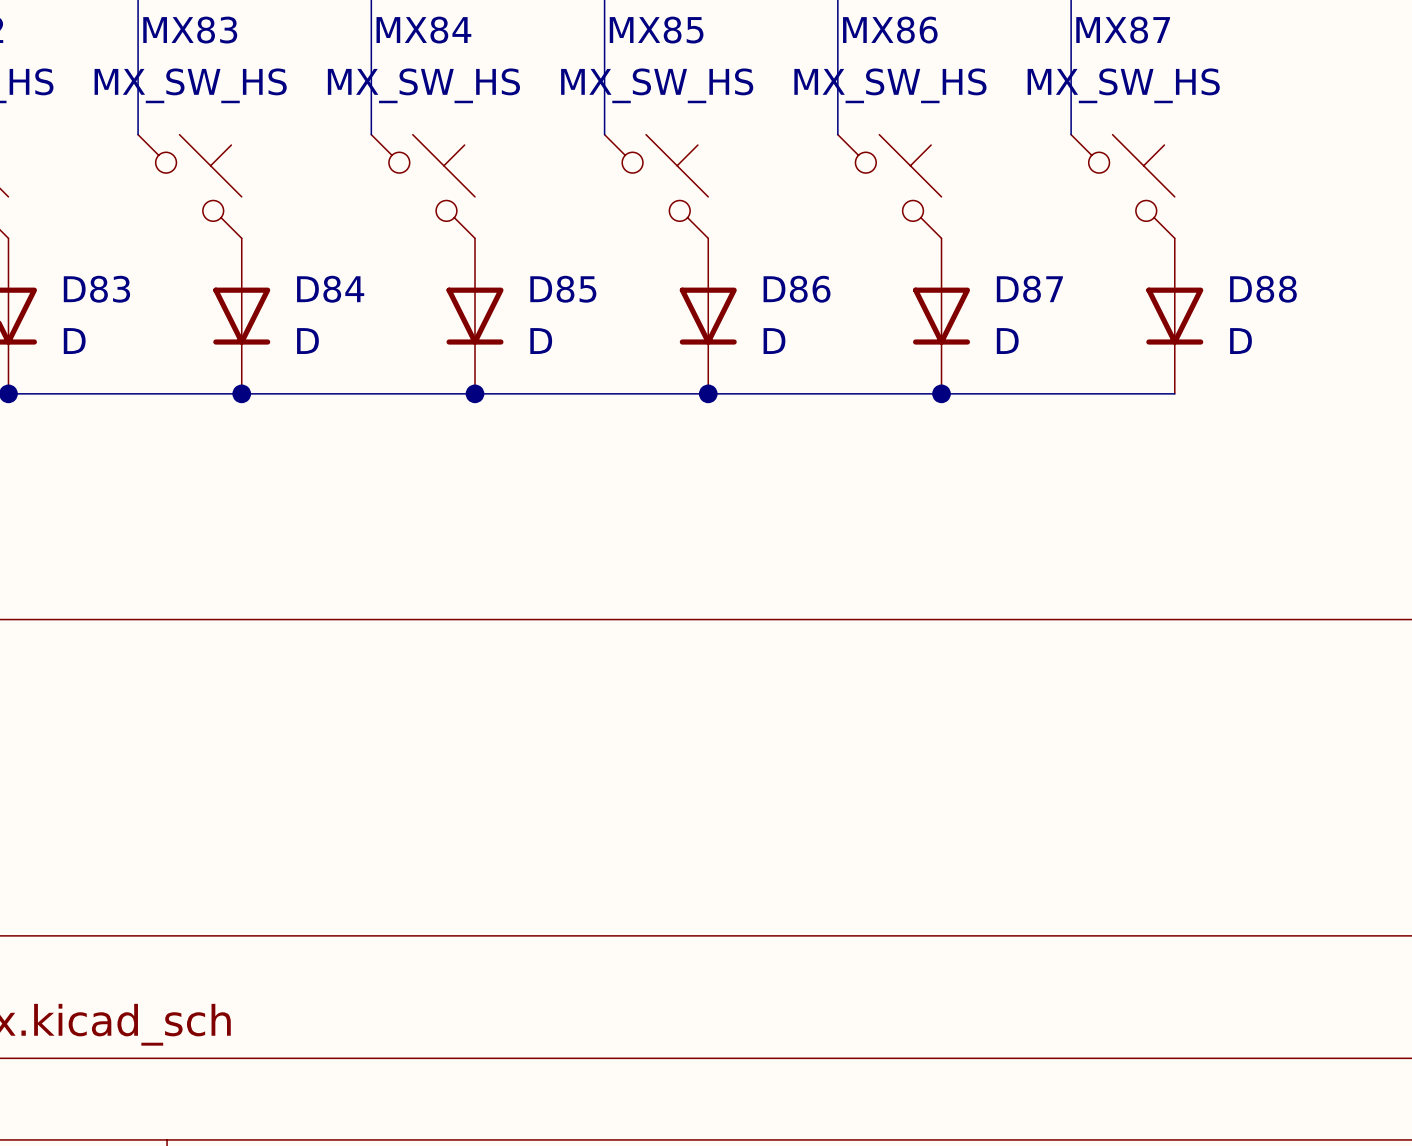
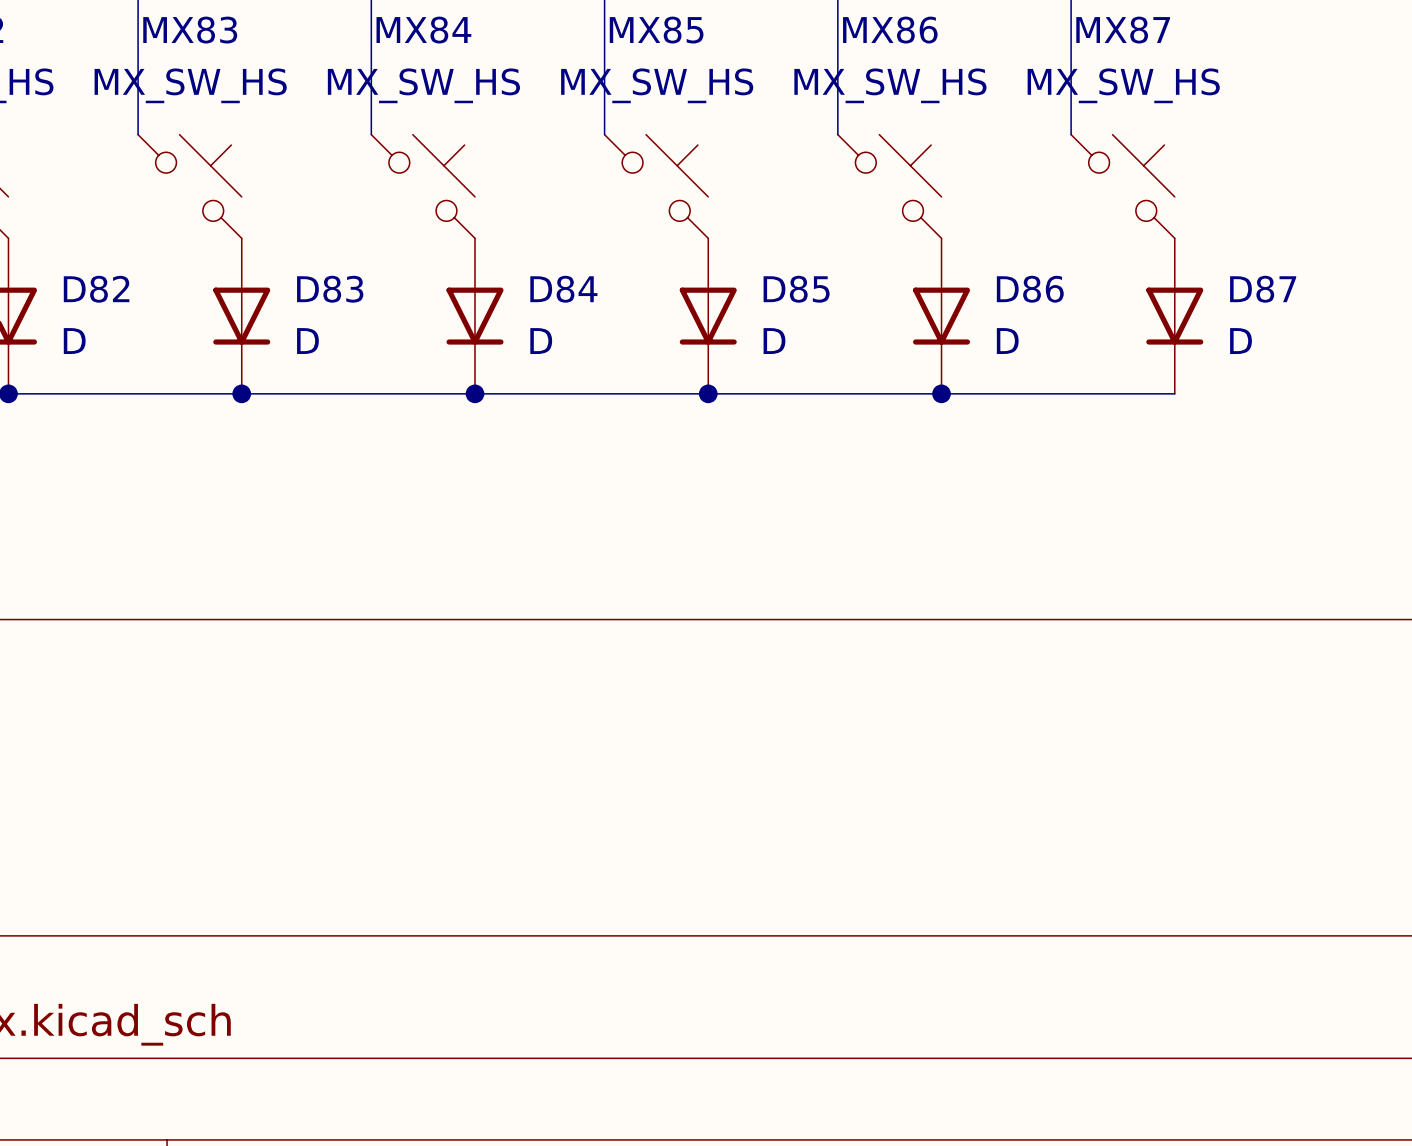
D83 name: D83 (96, 289) -> D82 (96, 289)
D84 name: D84 (330, 289) -> D83 (330, 289)
D85 name: D85 (563, 289) -> D84 (563, 289)
D86 name: D86 (797, 289) -> D85 (796, 289)
D87 name: D87 (1029, 289) -> D86 (1030, 289)
D88 name: D88 (1263, 289) -> D87 (1263, 289)

